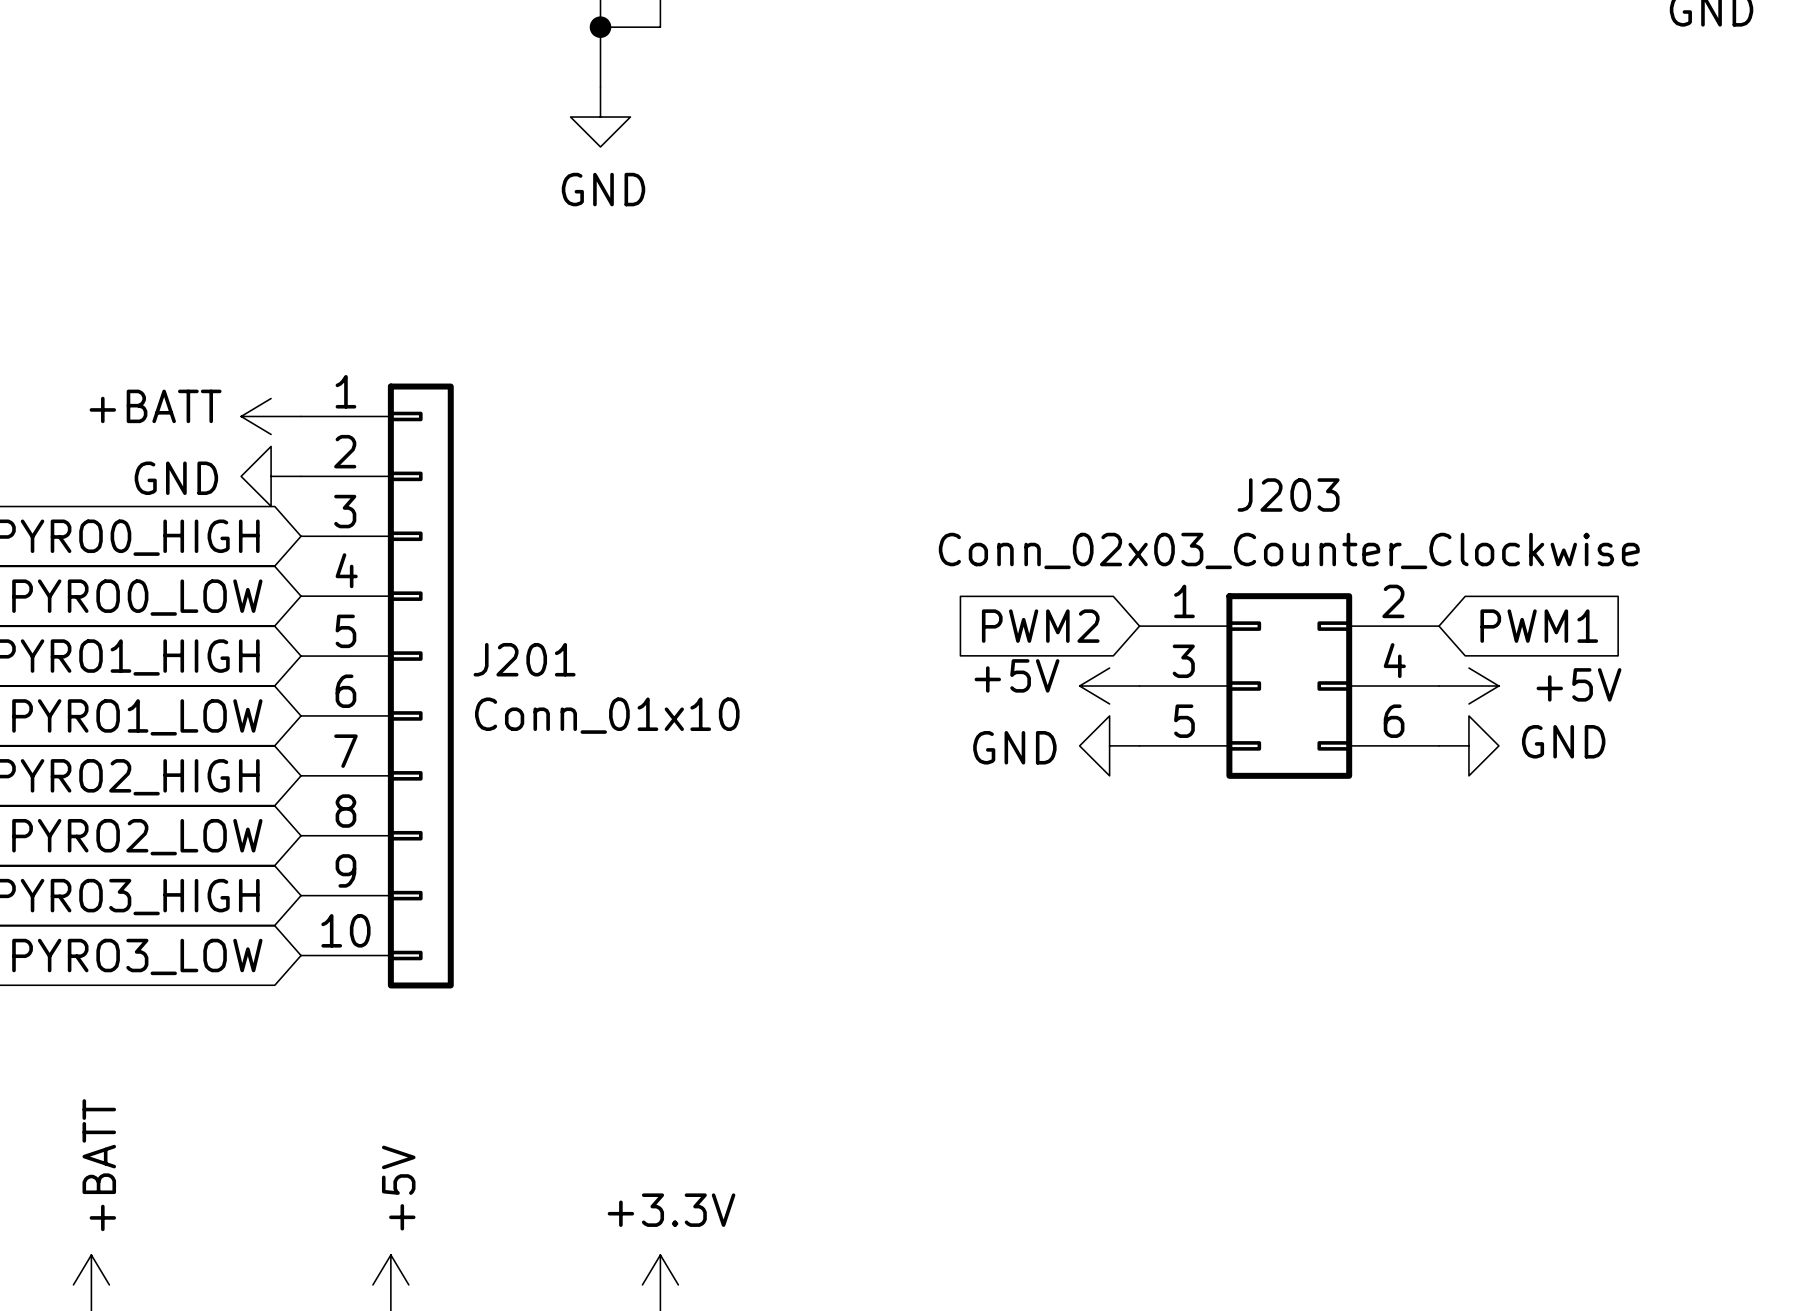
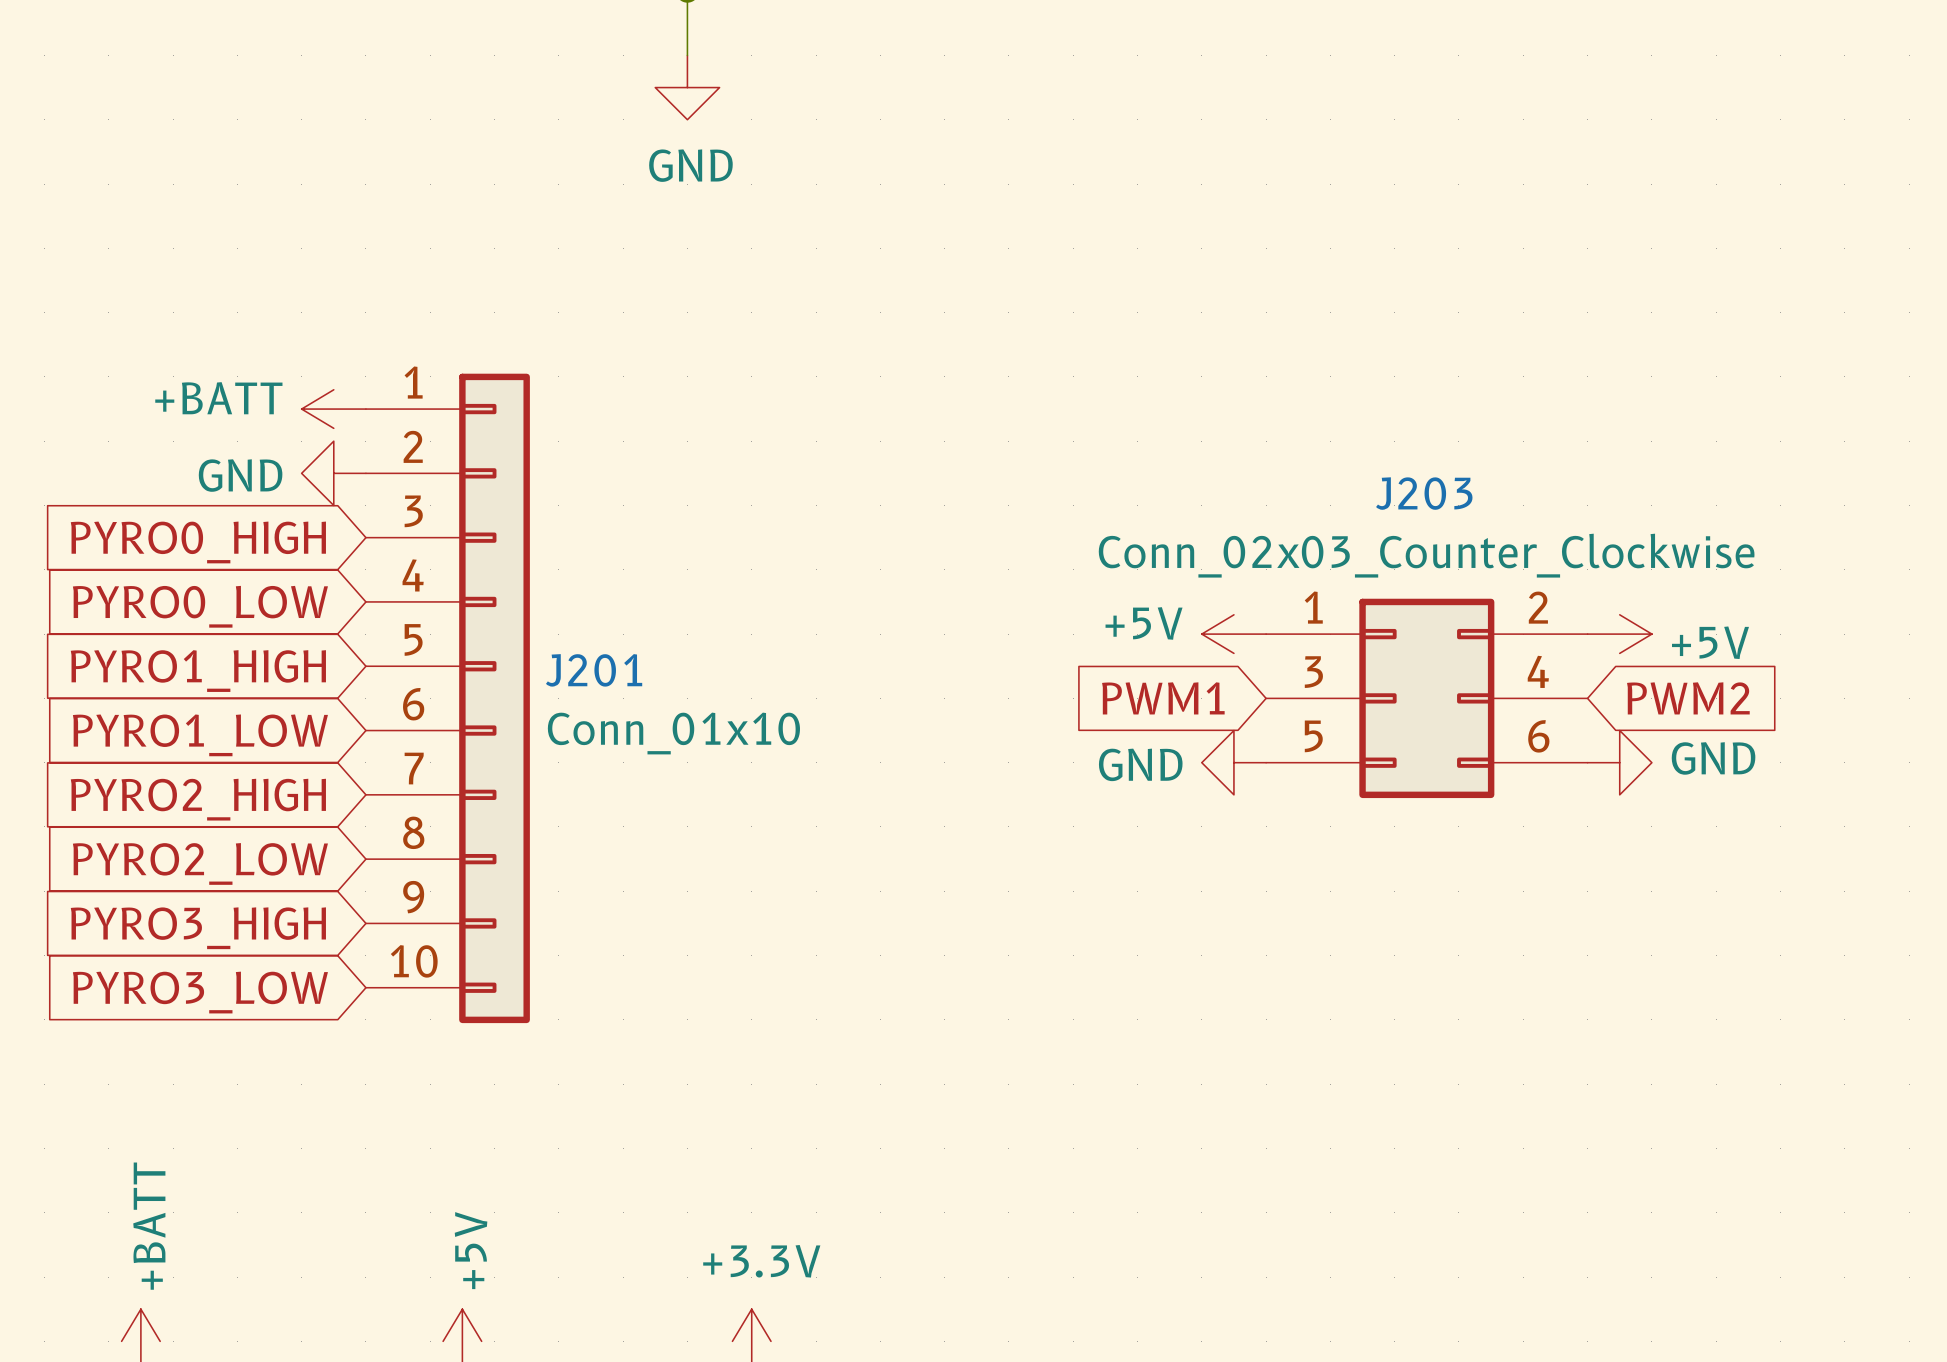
global label rotation: 0° (1040, 626) -> 180° (1688, 698)
global label position: PWM2 (1040, 626) -> PWM2 (1688, 698)
global label rotation: 0° (1539, 626) -> 180° (1163, 698)
global label position: PWM1 (1539, 626) -> PWM1 (1163, 698)
power symbol text position: +5V (1578, 684) -> +5V (1710, 642)
power symbol position: +5V (1109, 686) -> +5V (1233, 634)
power symbol position: +5V (1468, 686) -> +5V (1619, 634)

